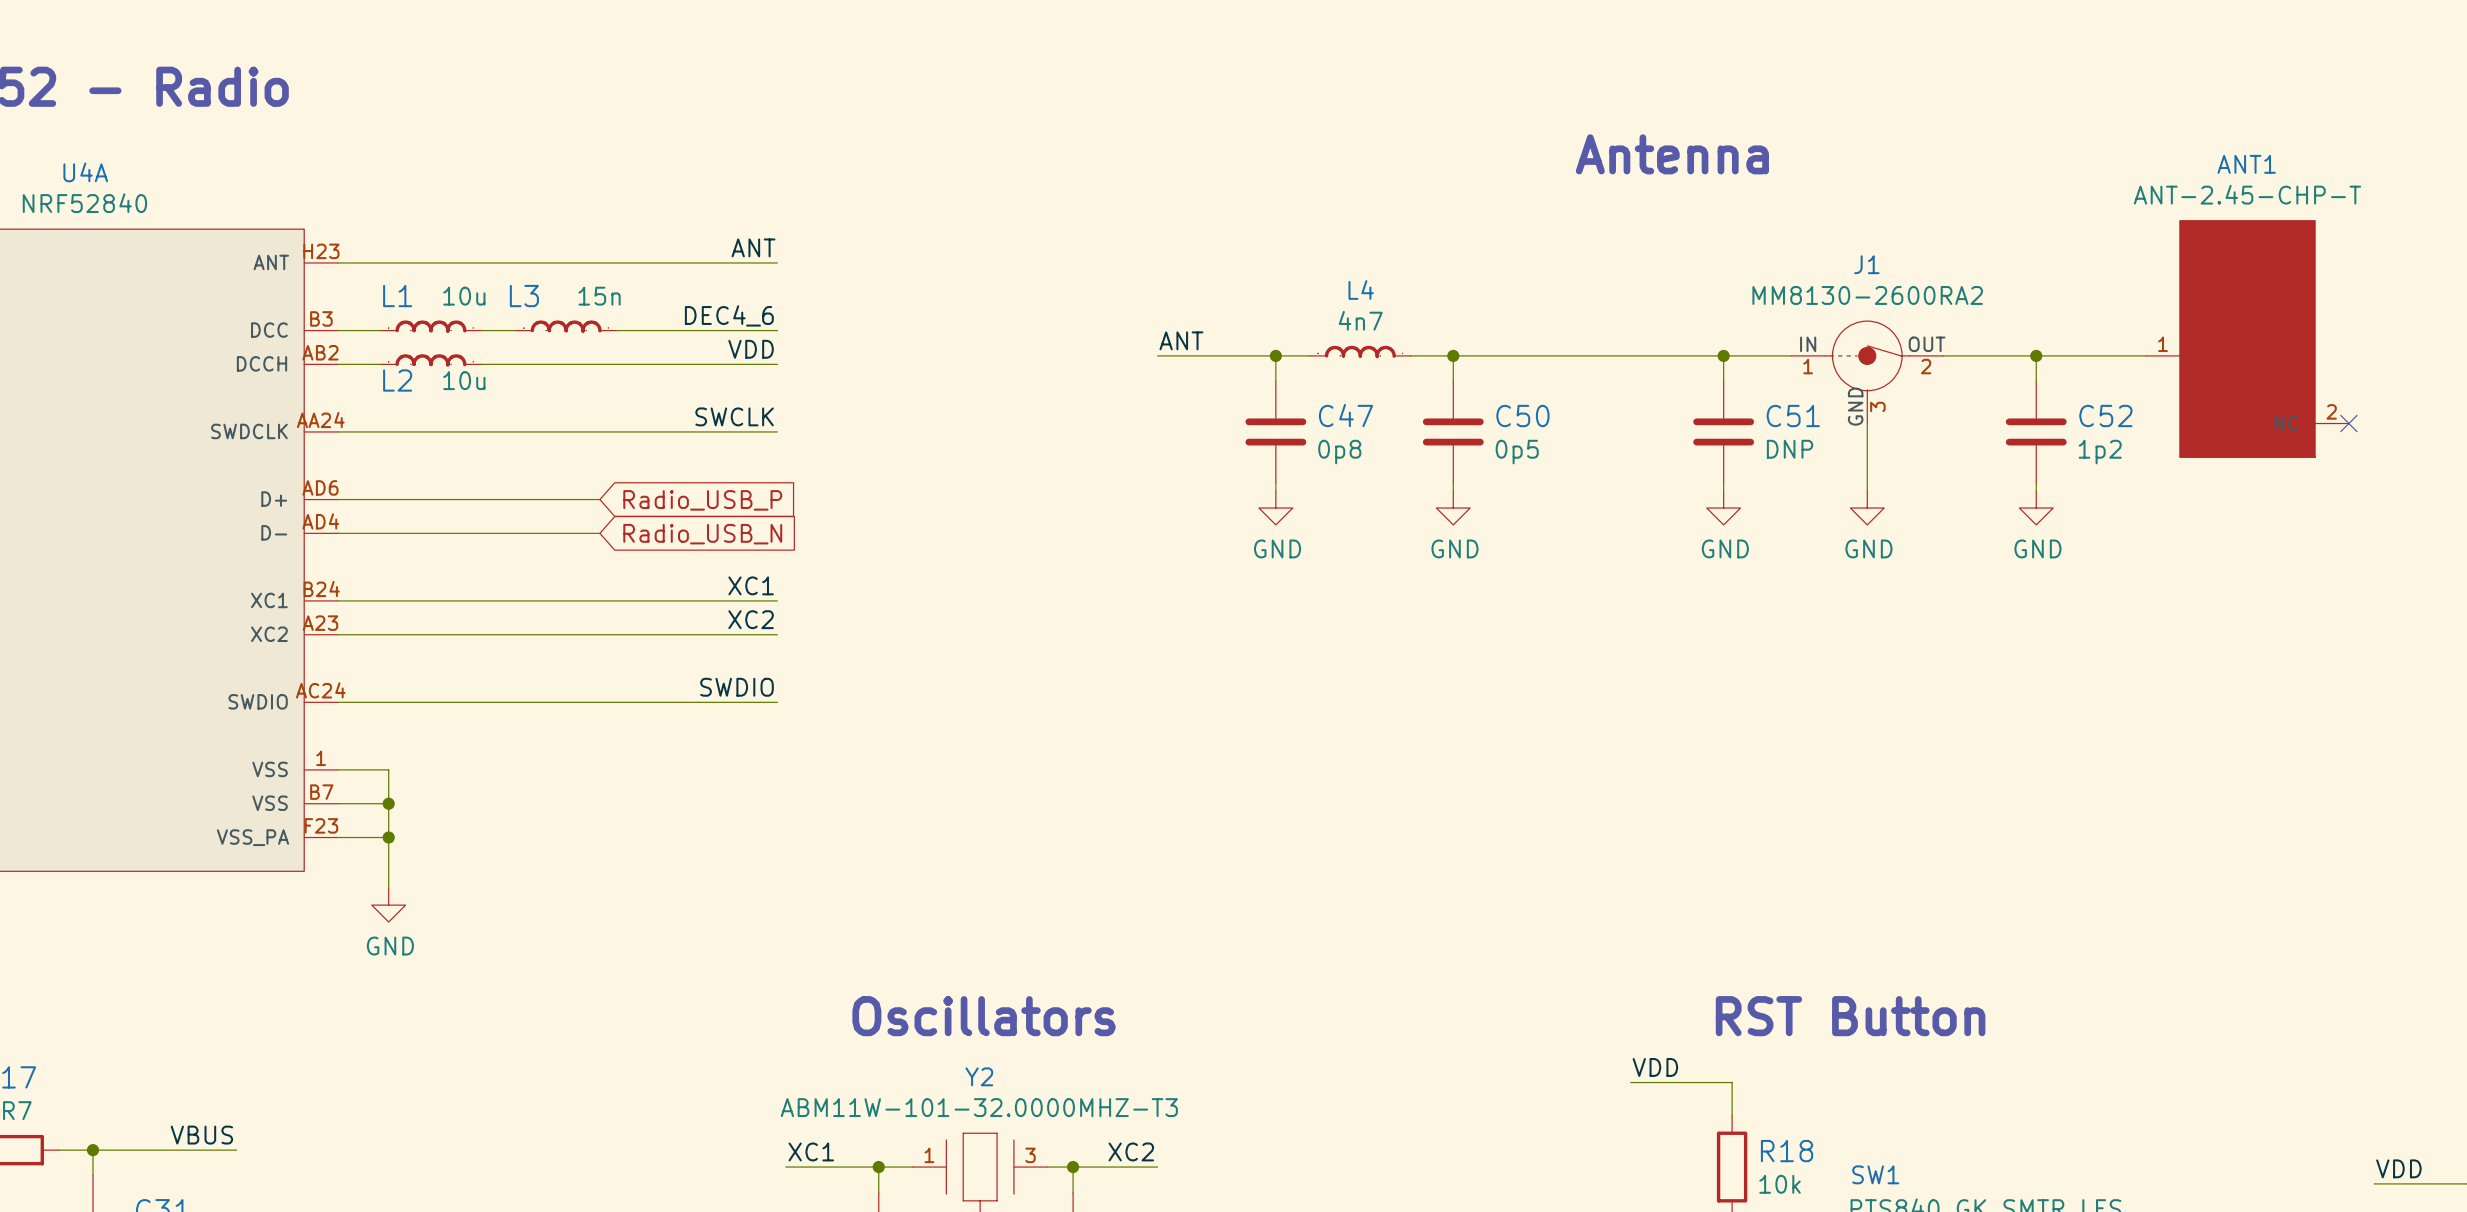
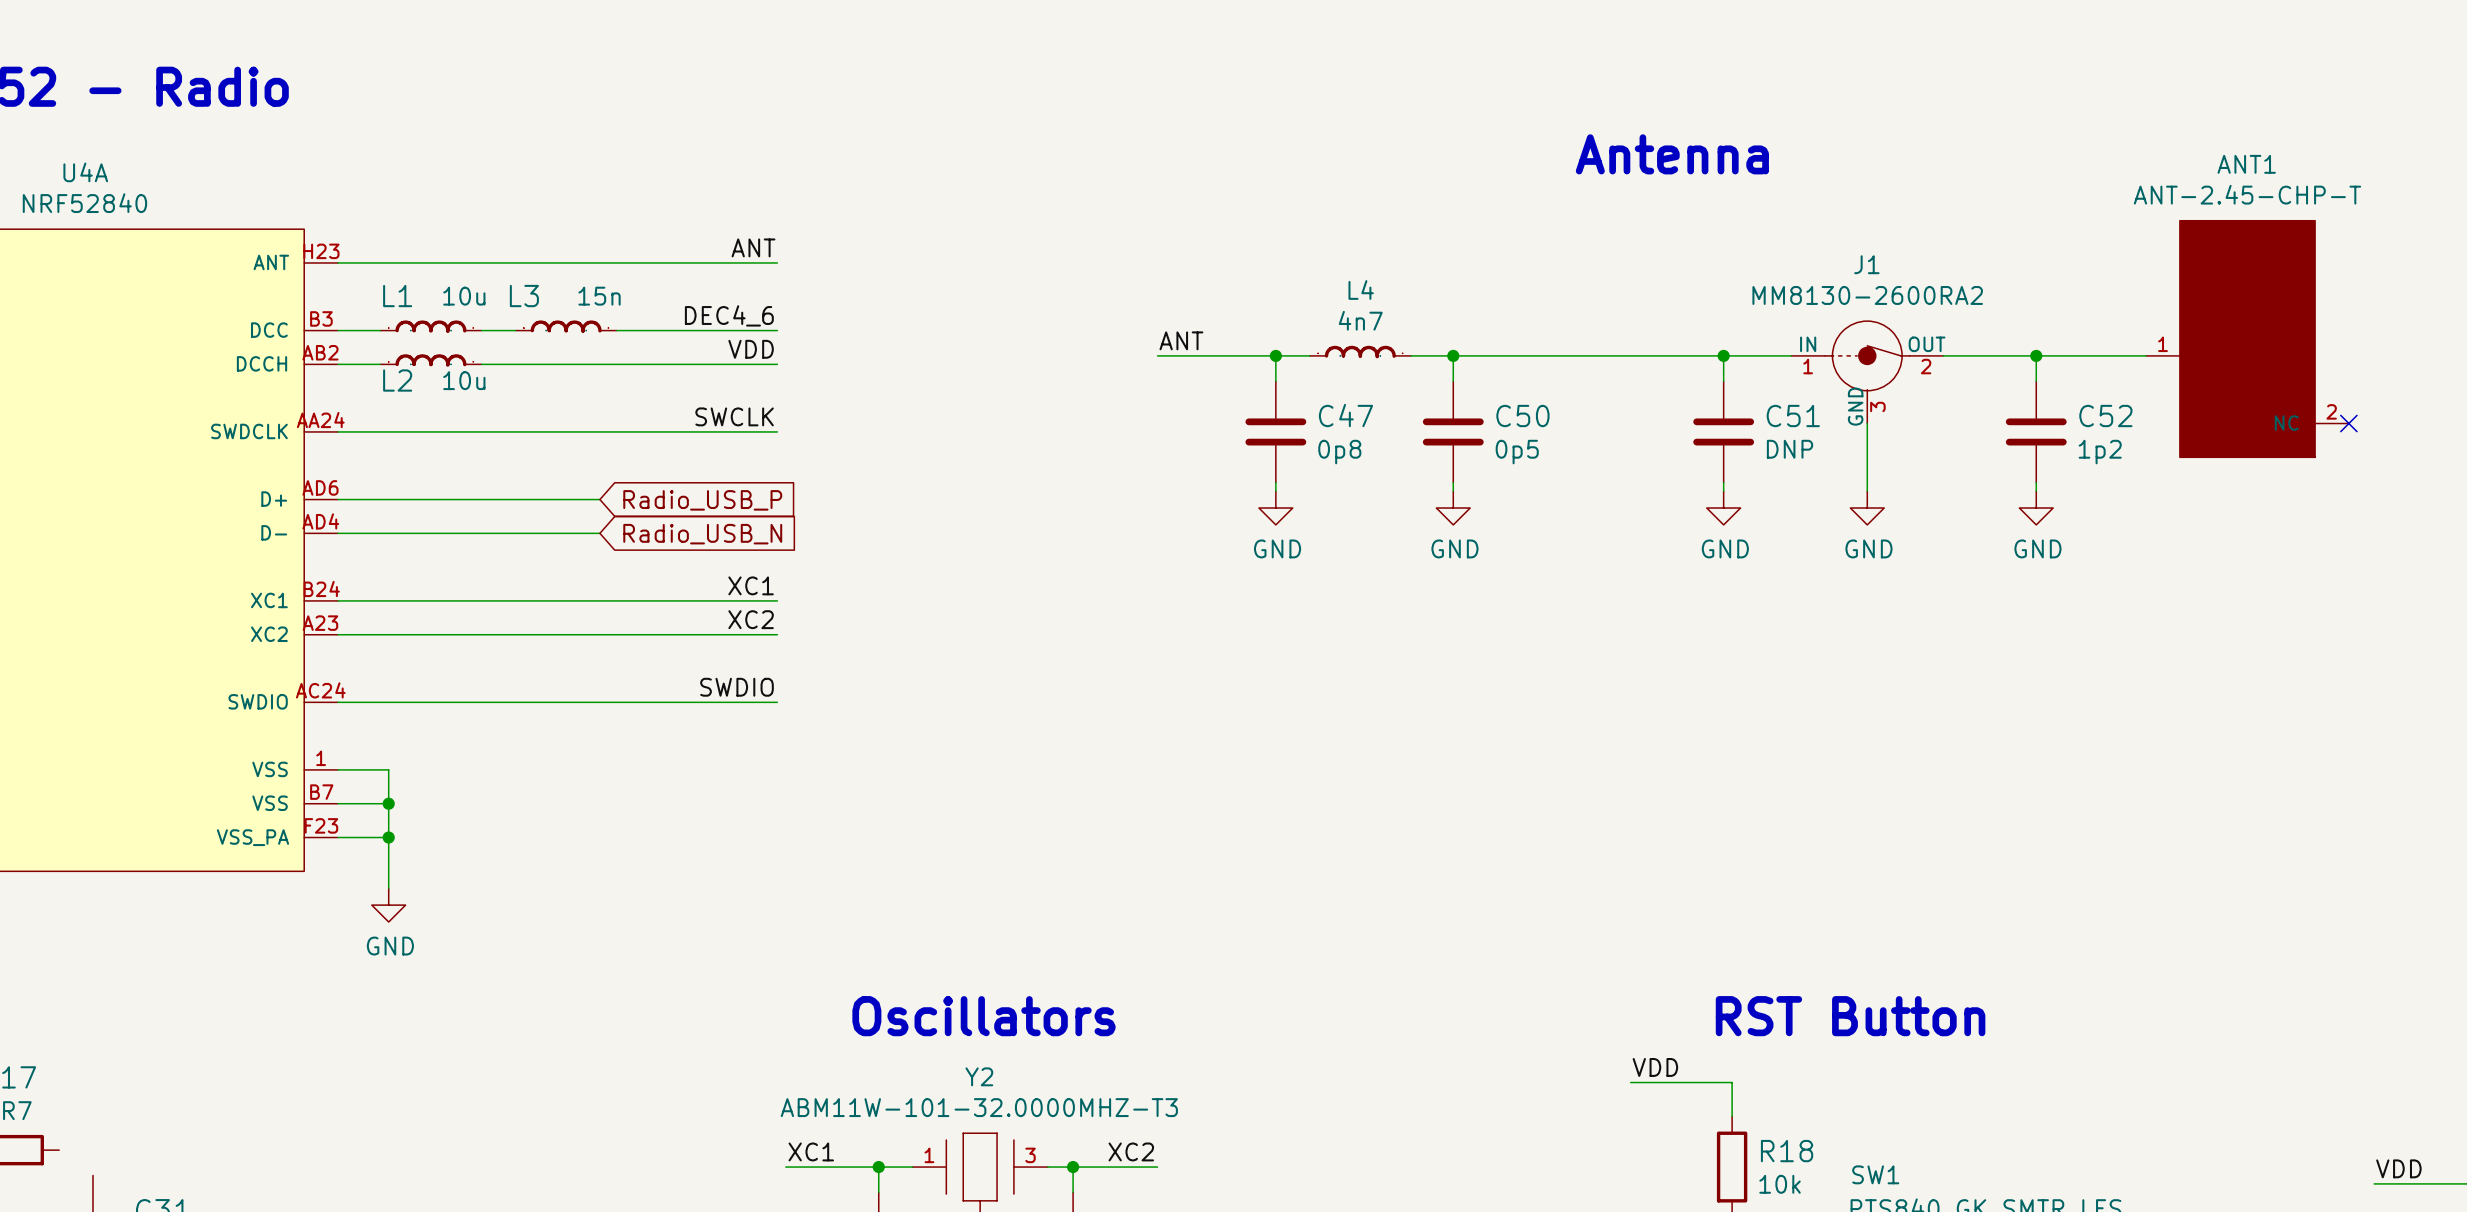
label: VBUS (201, 1135) -> none
wire: (59, 1150) (236, 1150) -> none
wire: (92, 1150) (92, 1175) -> none
junction: (92, 1150) -> none

